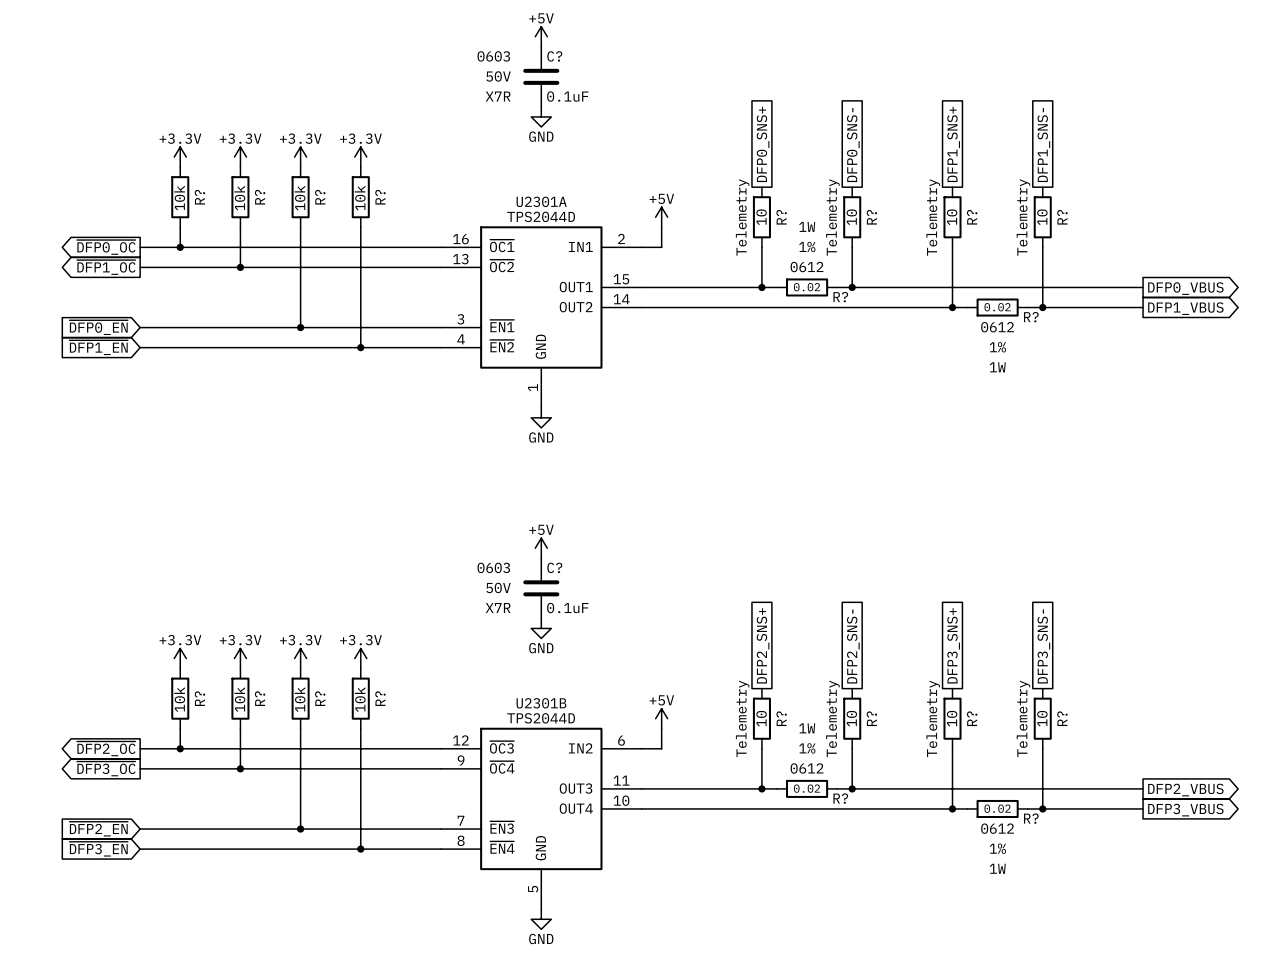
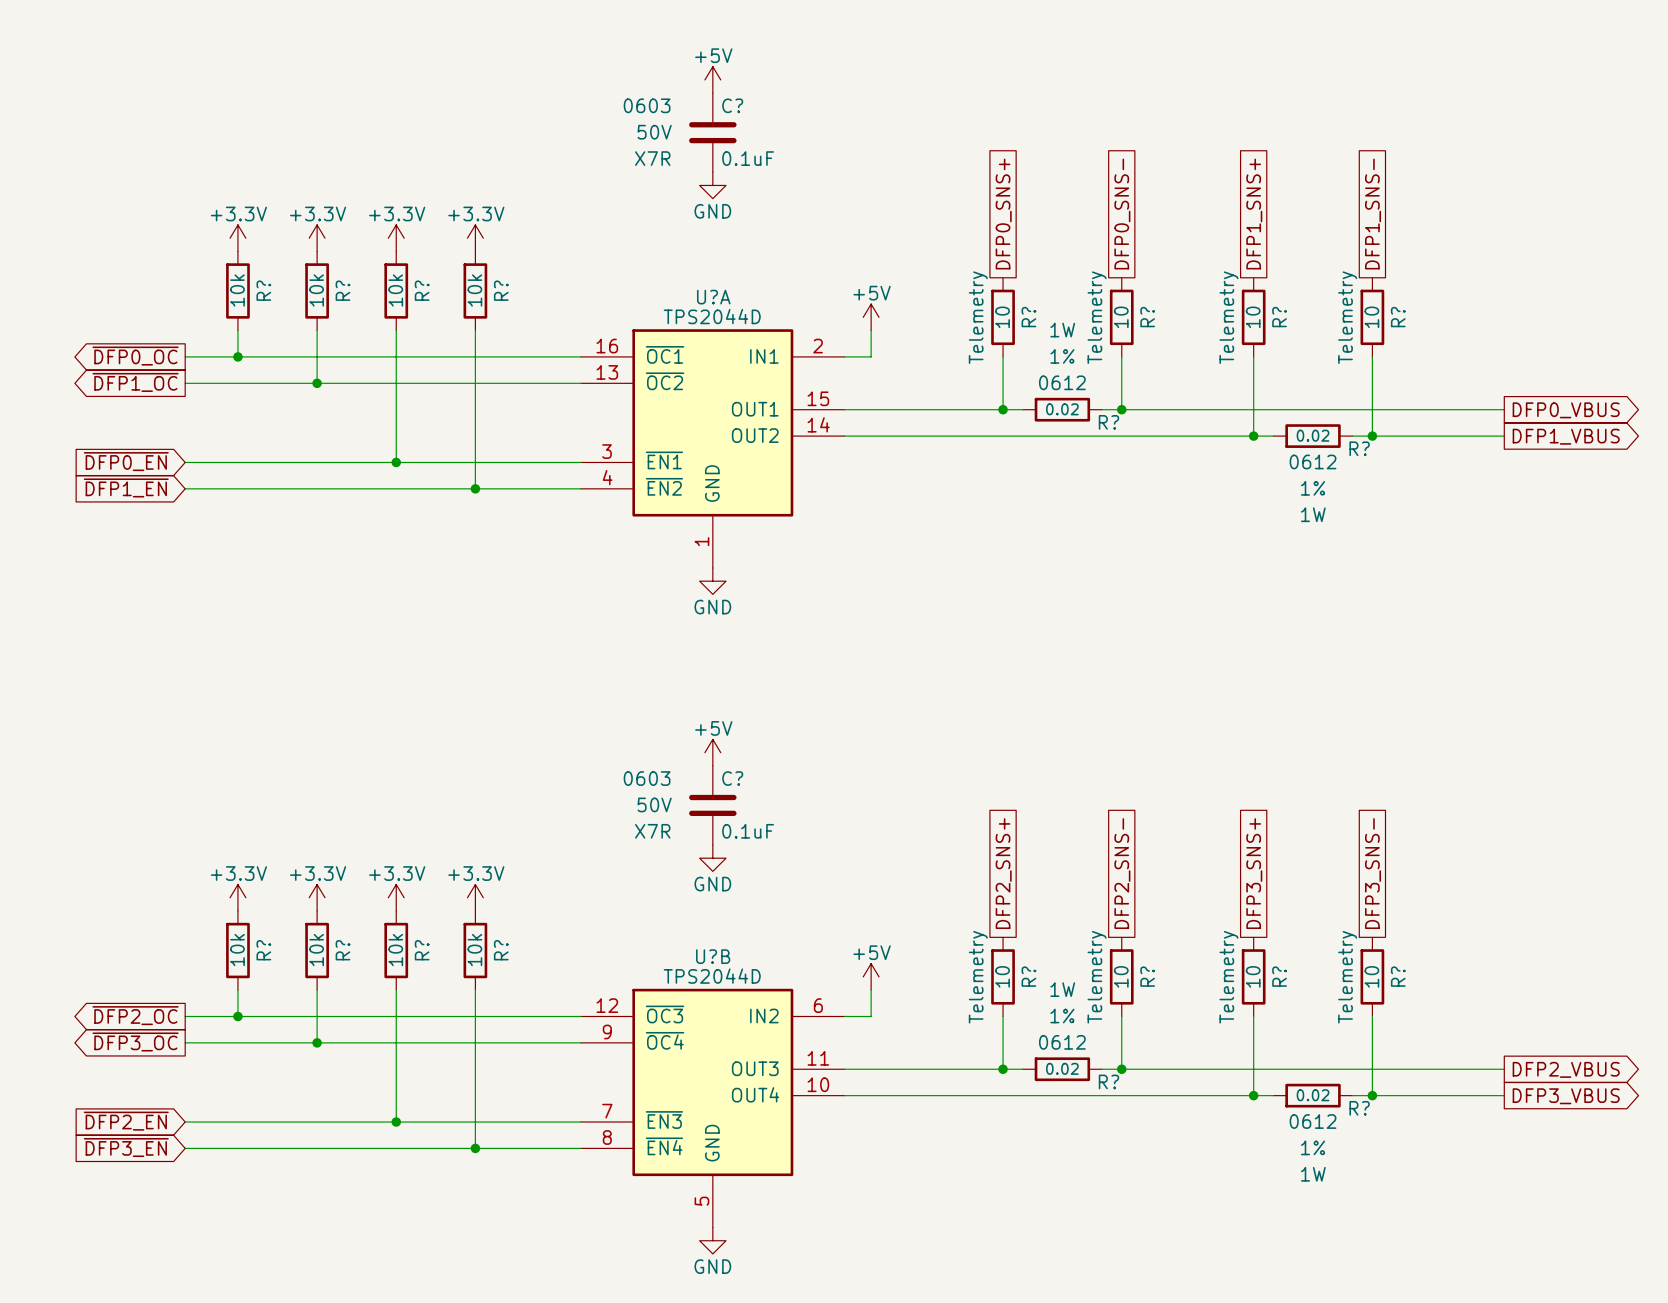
U2301A name: U2301A (541, 201) -> U?A (713, 297)
U2301B name: U2301B (541, 703) -> U?B (713, 956)

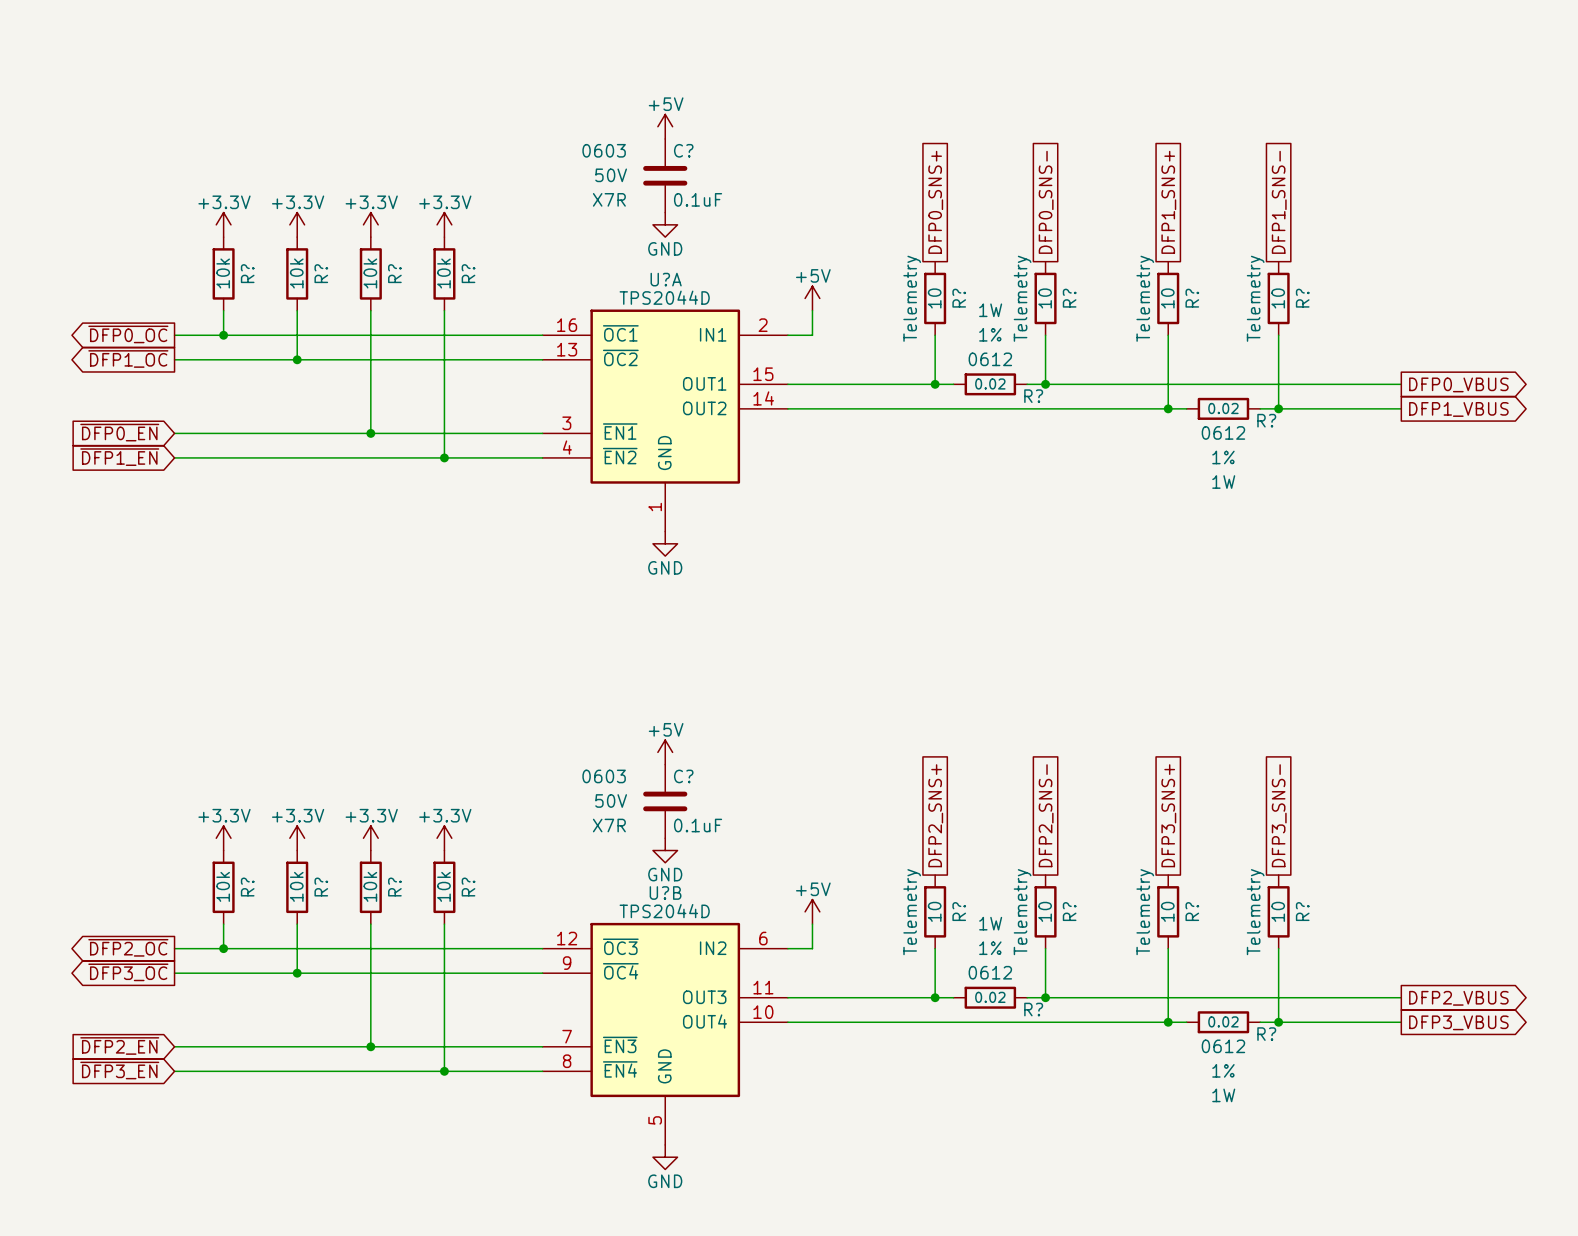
power symbol position: +5V (712, 79) -> +5V (665, 126)
C? position: (712, 132) -> (665, 175)
power symbol position: GND (712, 185) -> GND (665, 224)
power symbol position: +5V (712, 752) -> +5V (665, 752)
C? position: (712, 805) -> (665, 801)
power symbol position: GND (712, 858) -> GND (665, 850)

